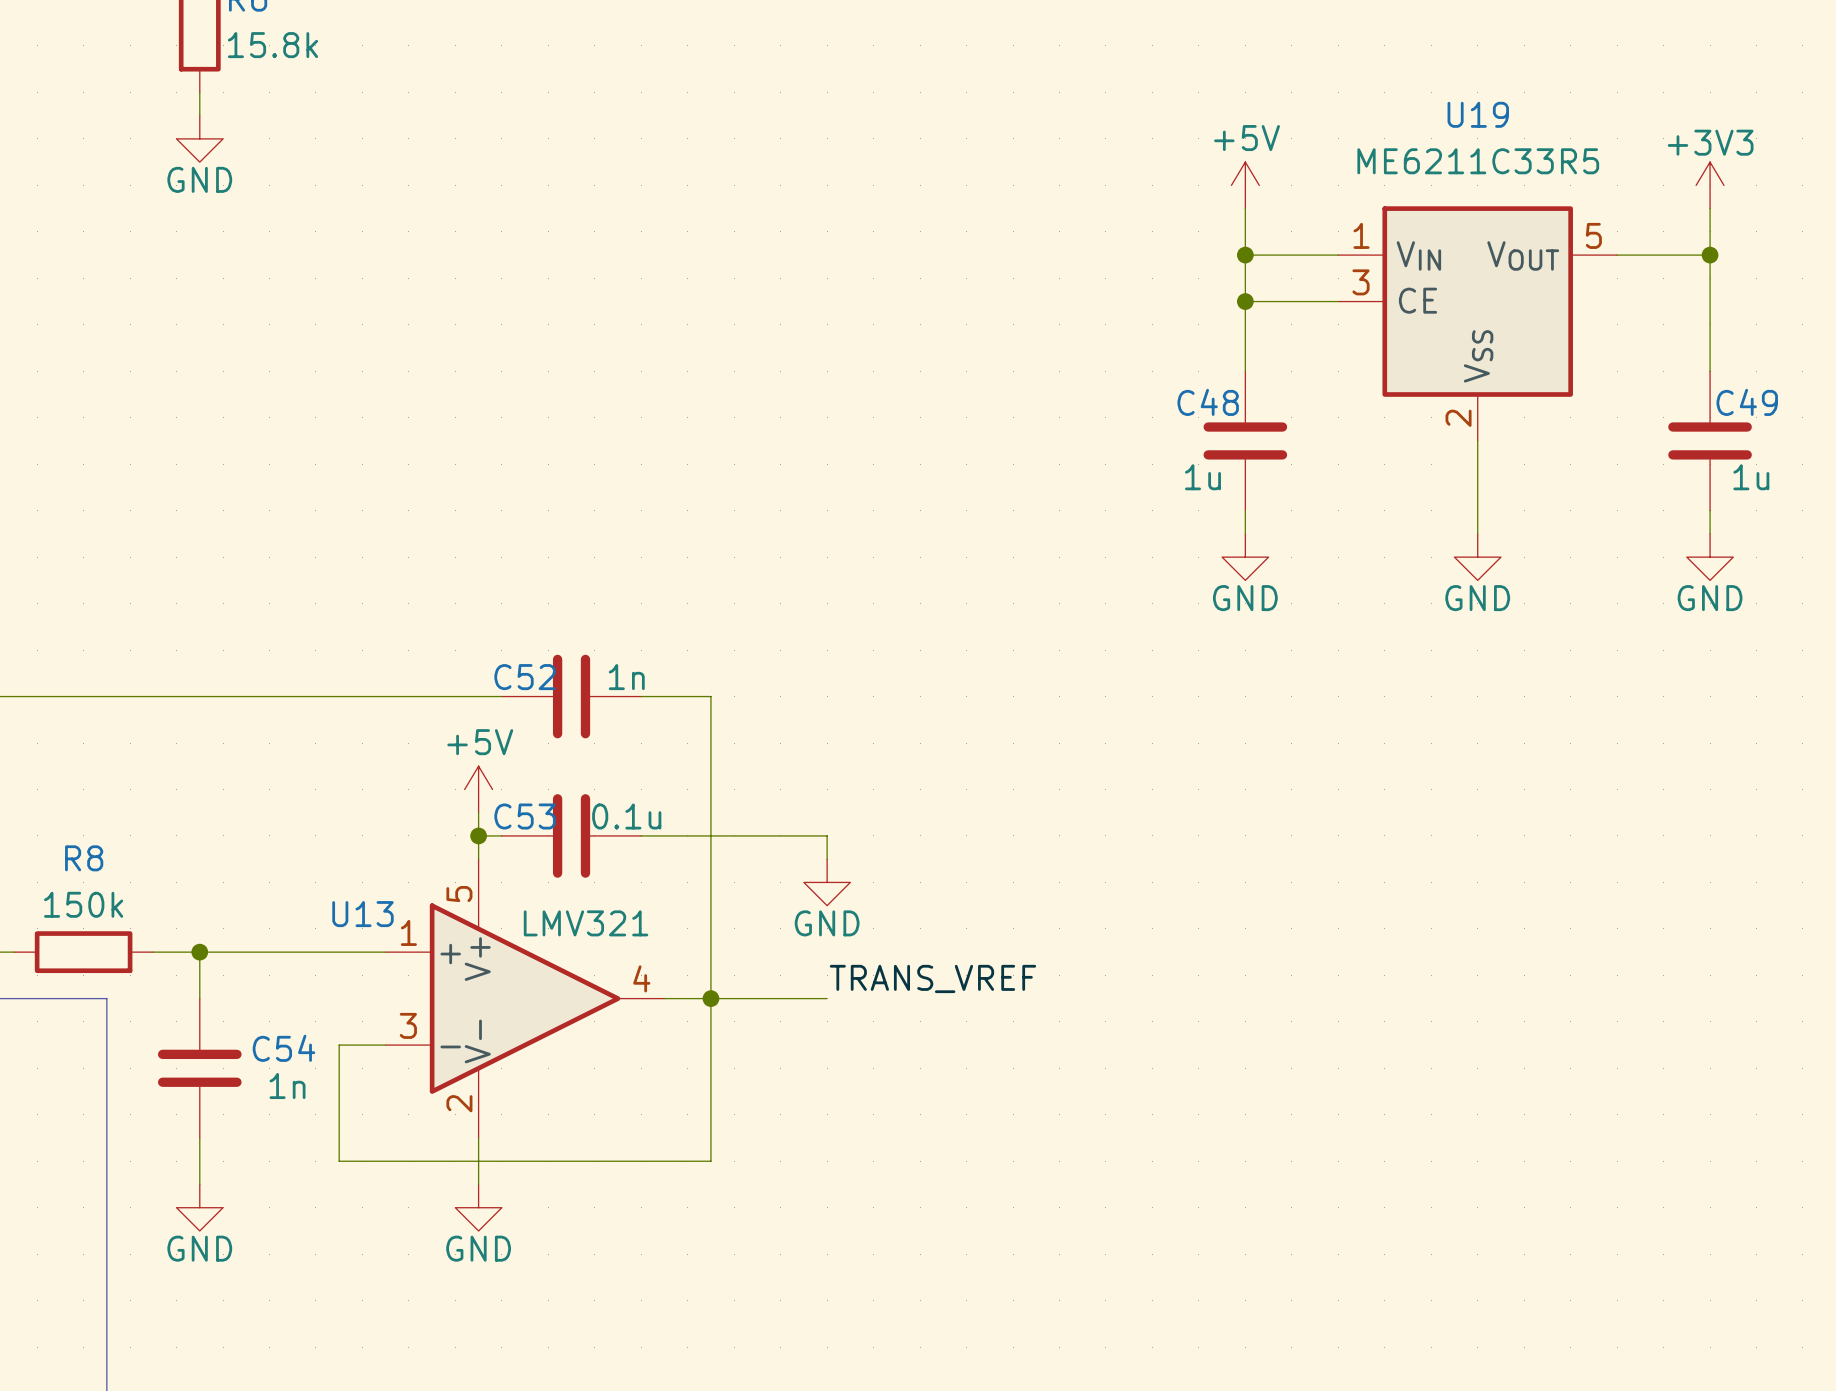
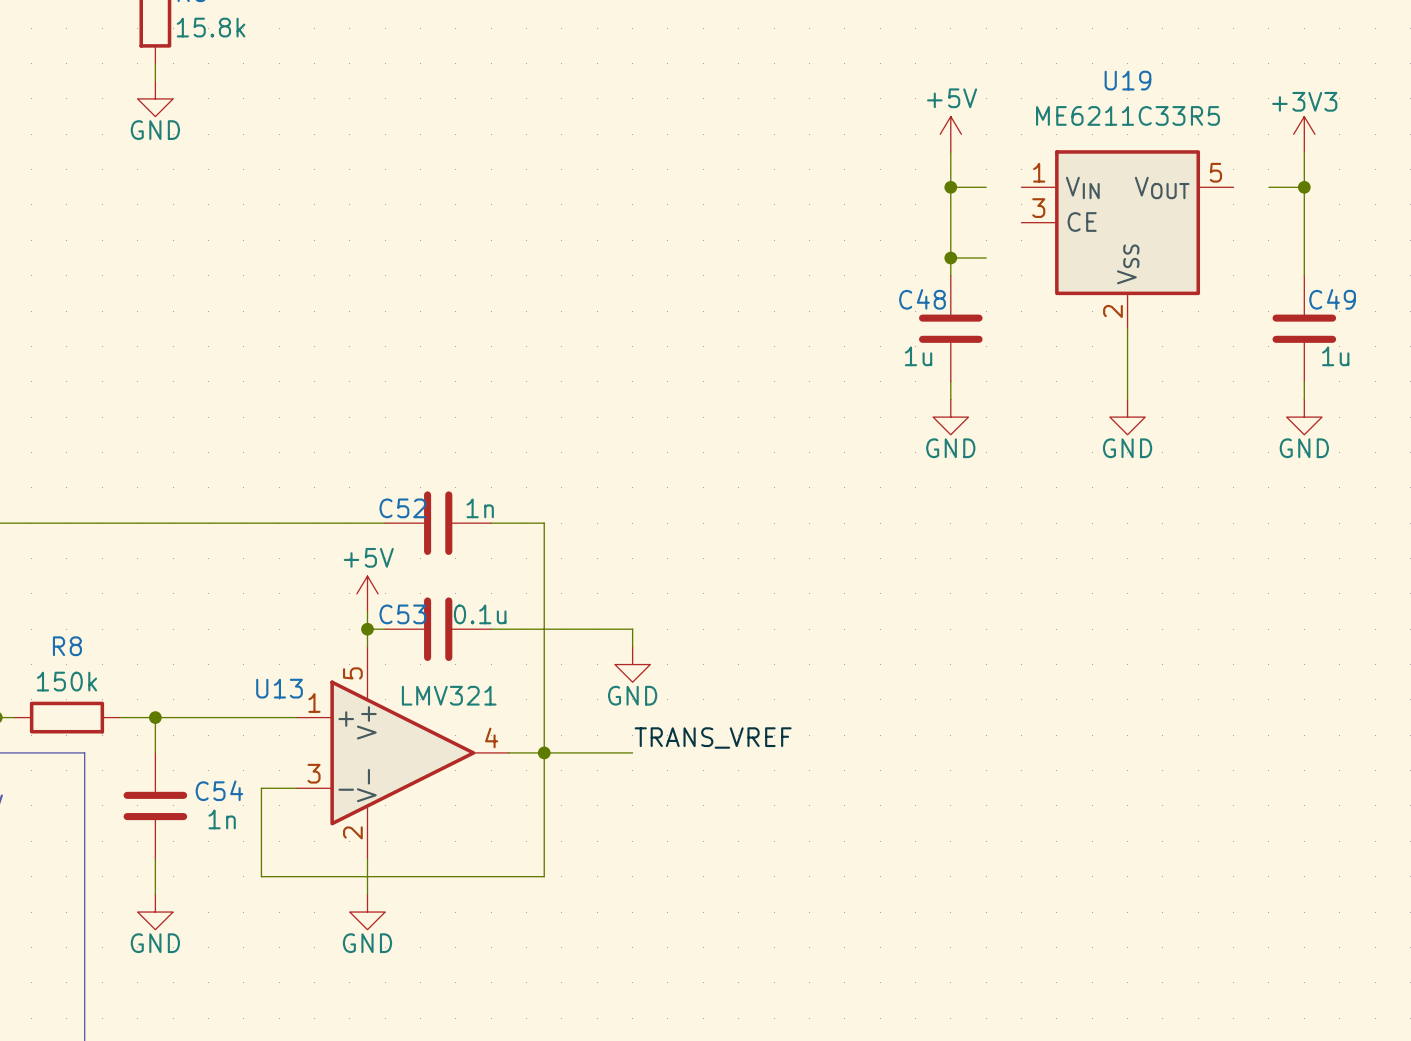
wire: (1291, 255) (1338, 255) -> (950, 258) (986, 258)
wire: (1617, 255) (1663, 255) -> none
wire: (1245, 301) (1338, 301) -> none
junction position: (1245, 301) -> (950, 258)

